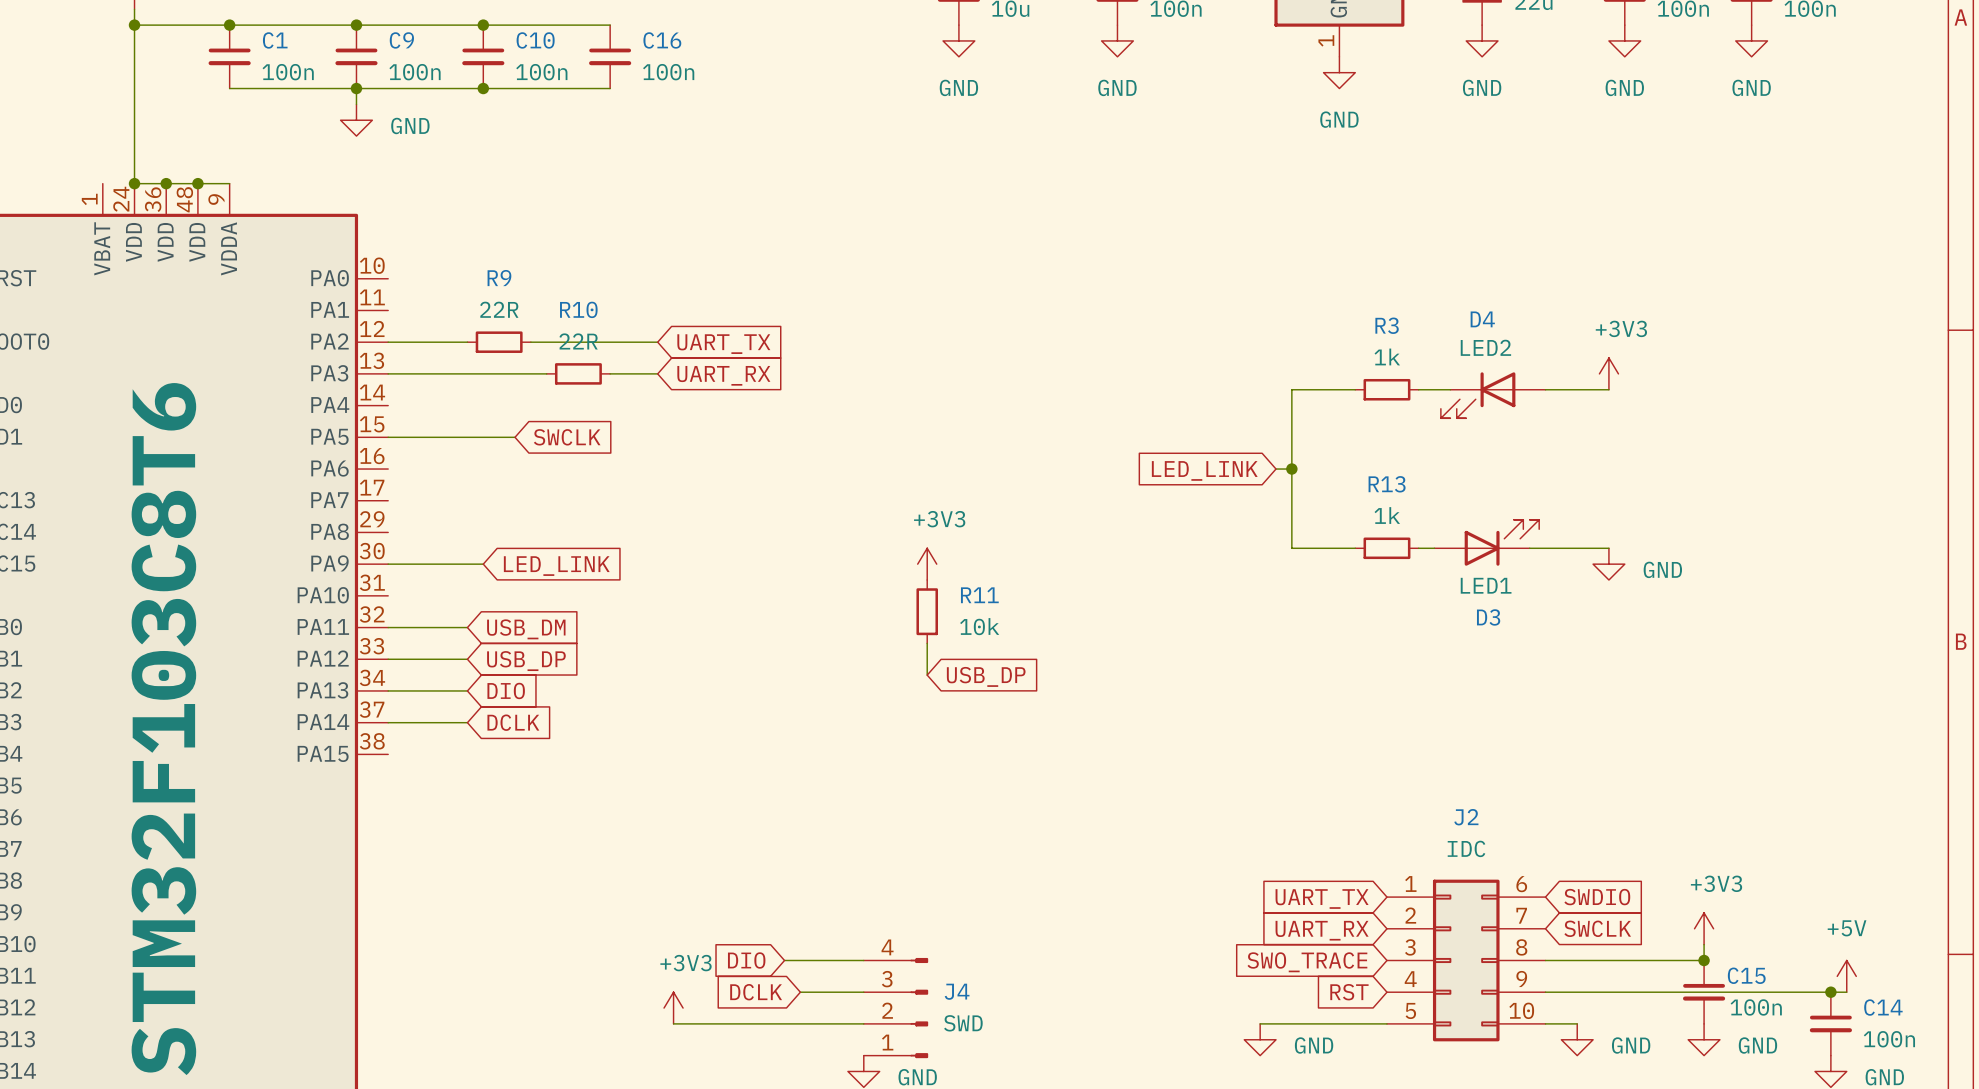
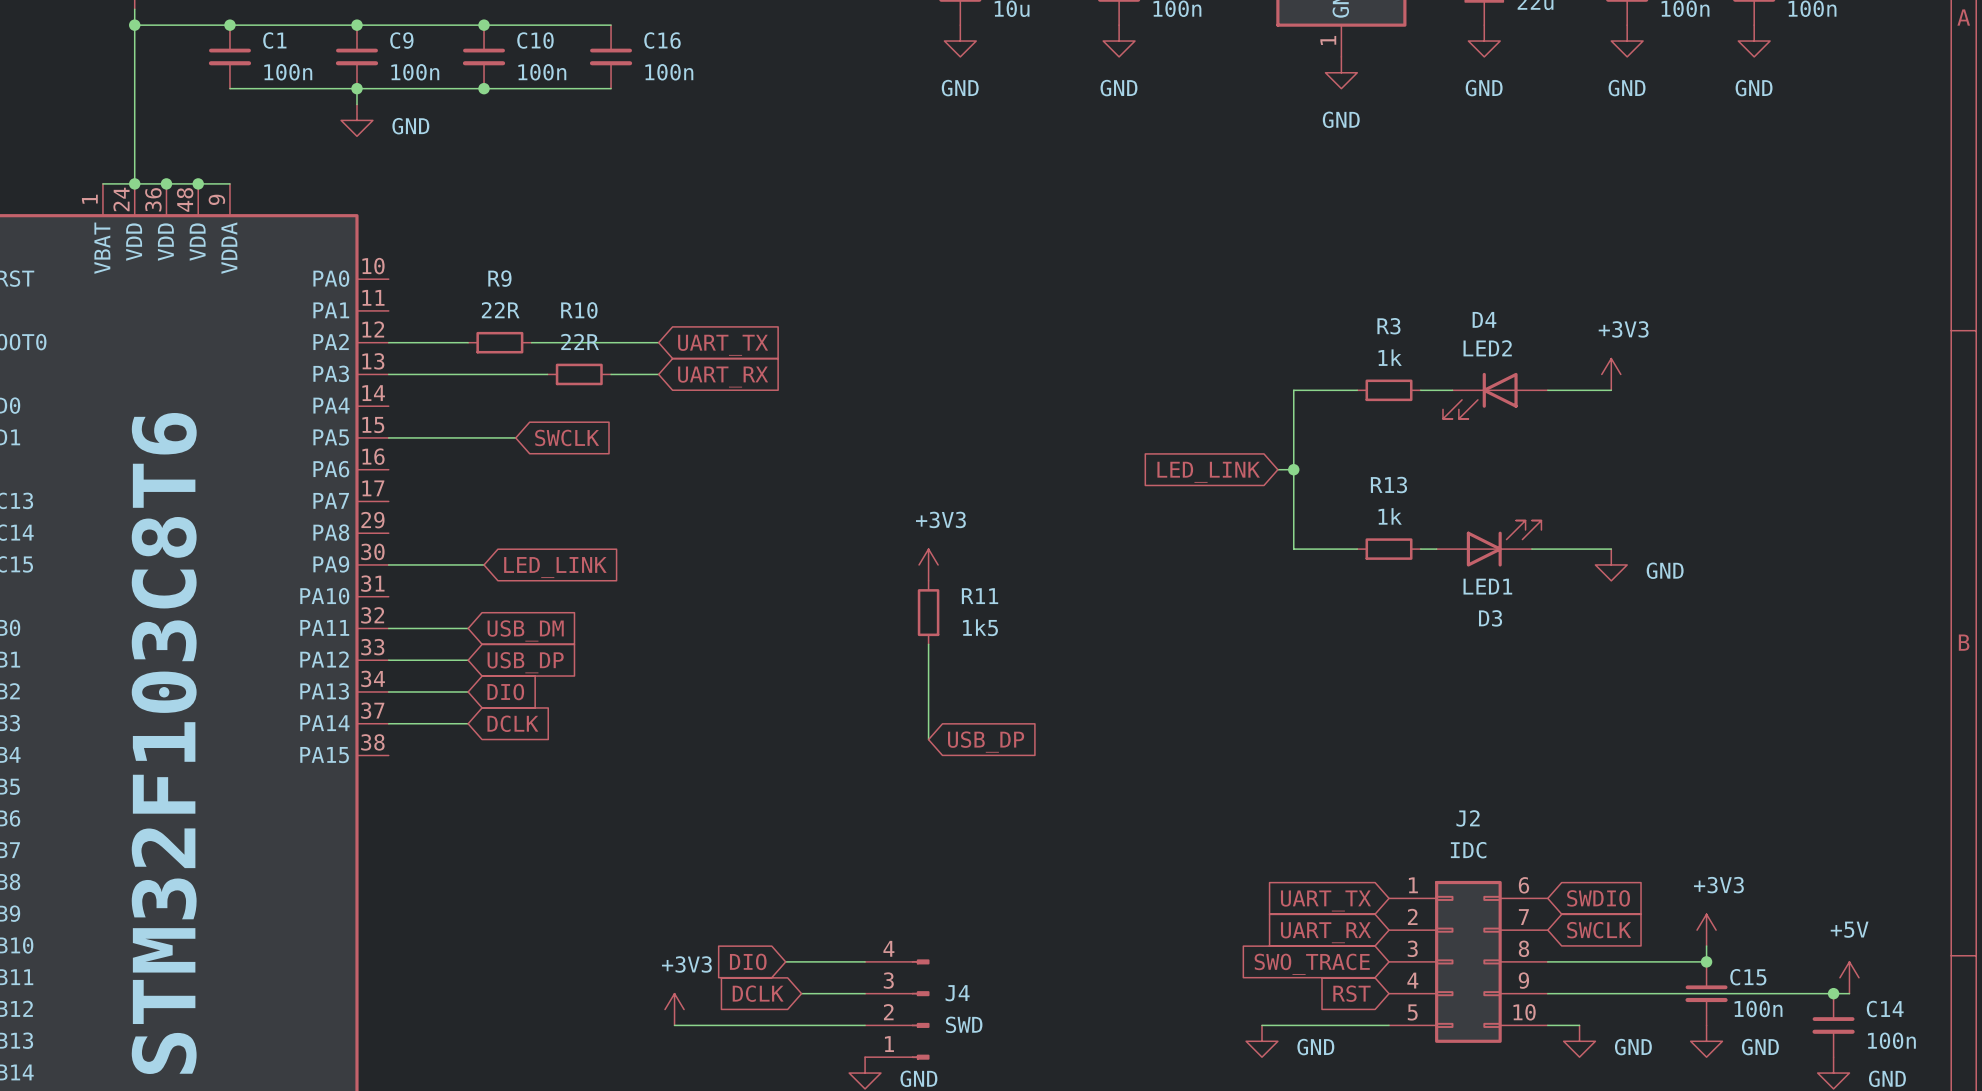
wire: none -> (102, 183) (134, 183)
R11 value: 10k (979, 626) -> 1k5 (980, 627)
wire: none -> (928, 676) (928, 739)
global label position: USB_DP (986, 676) -> USB_DP (986, 742)

